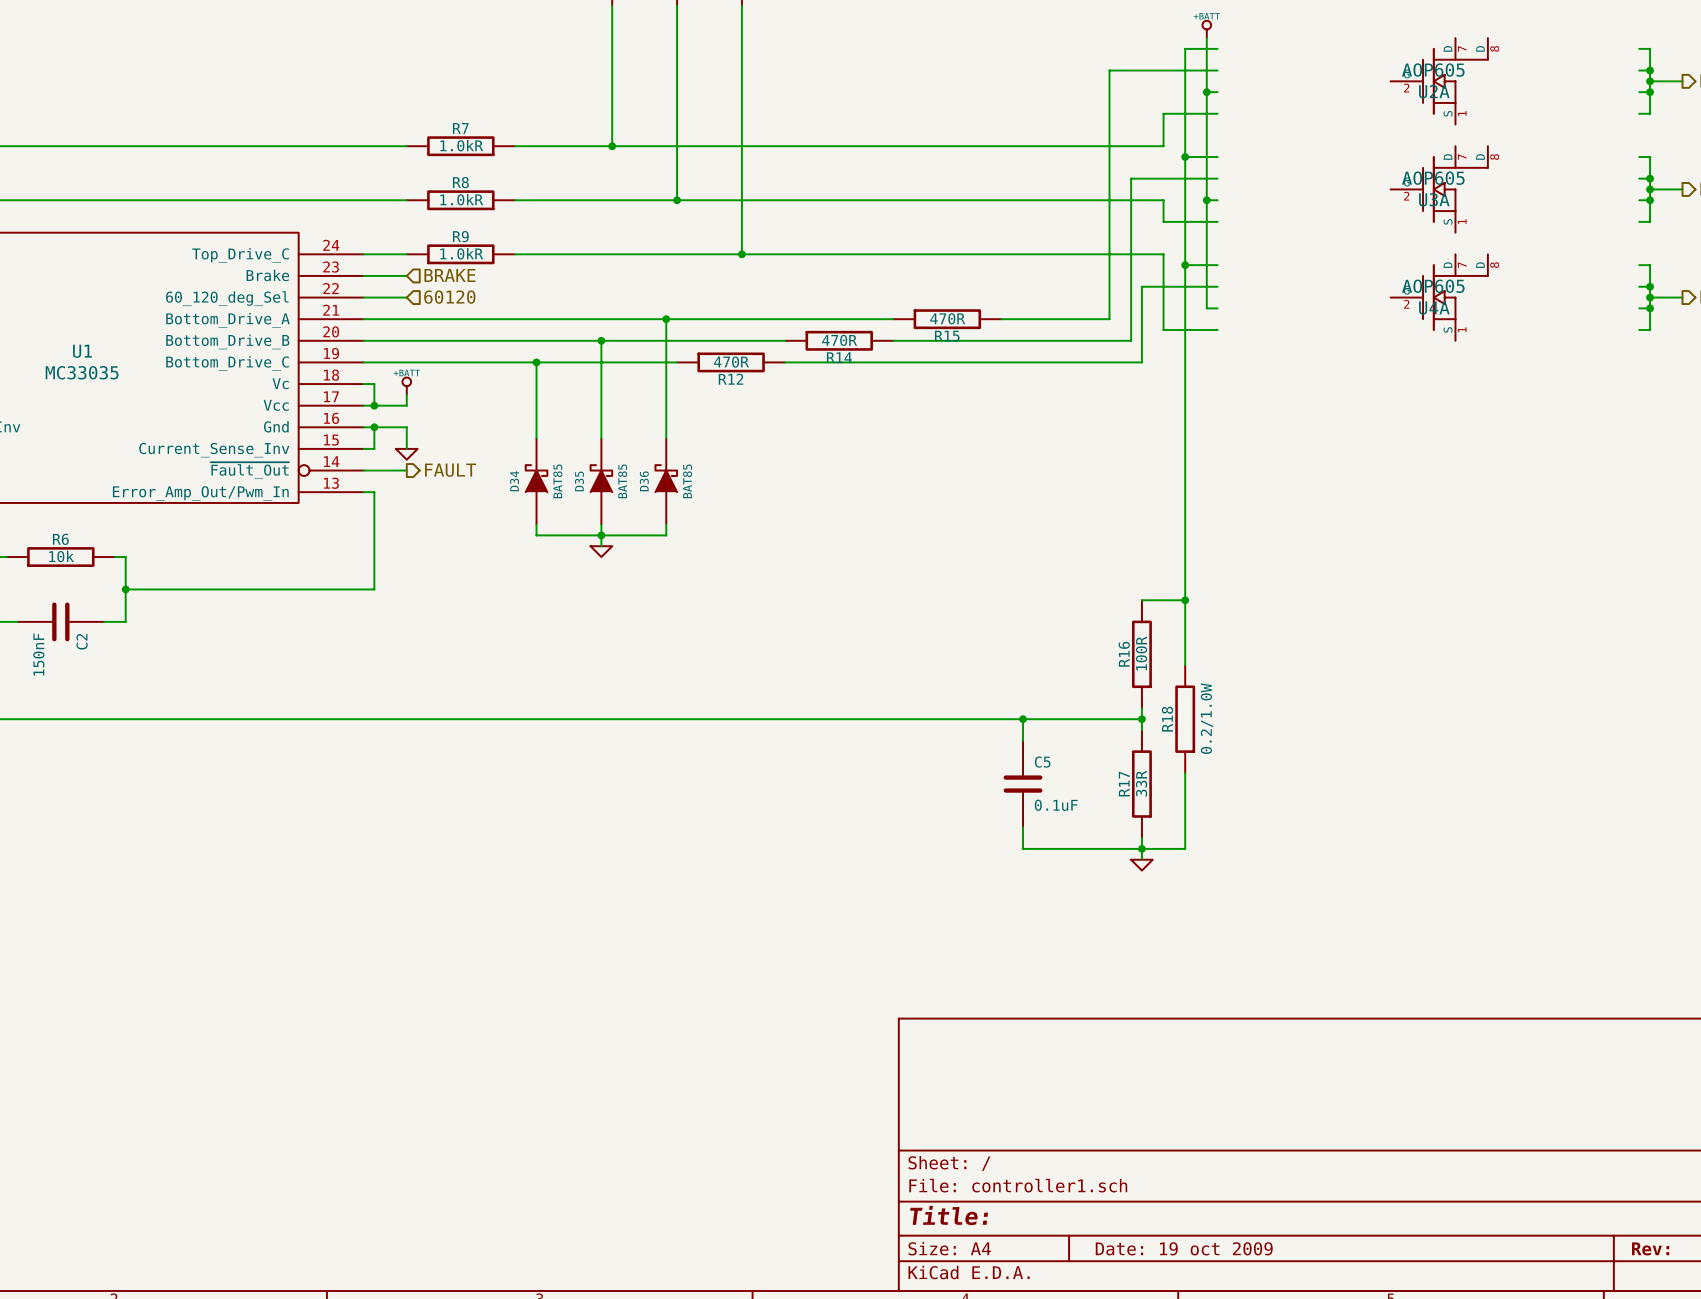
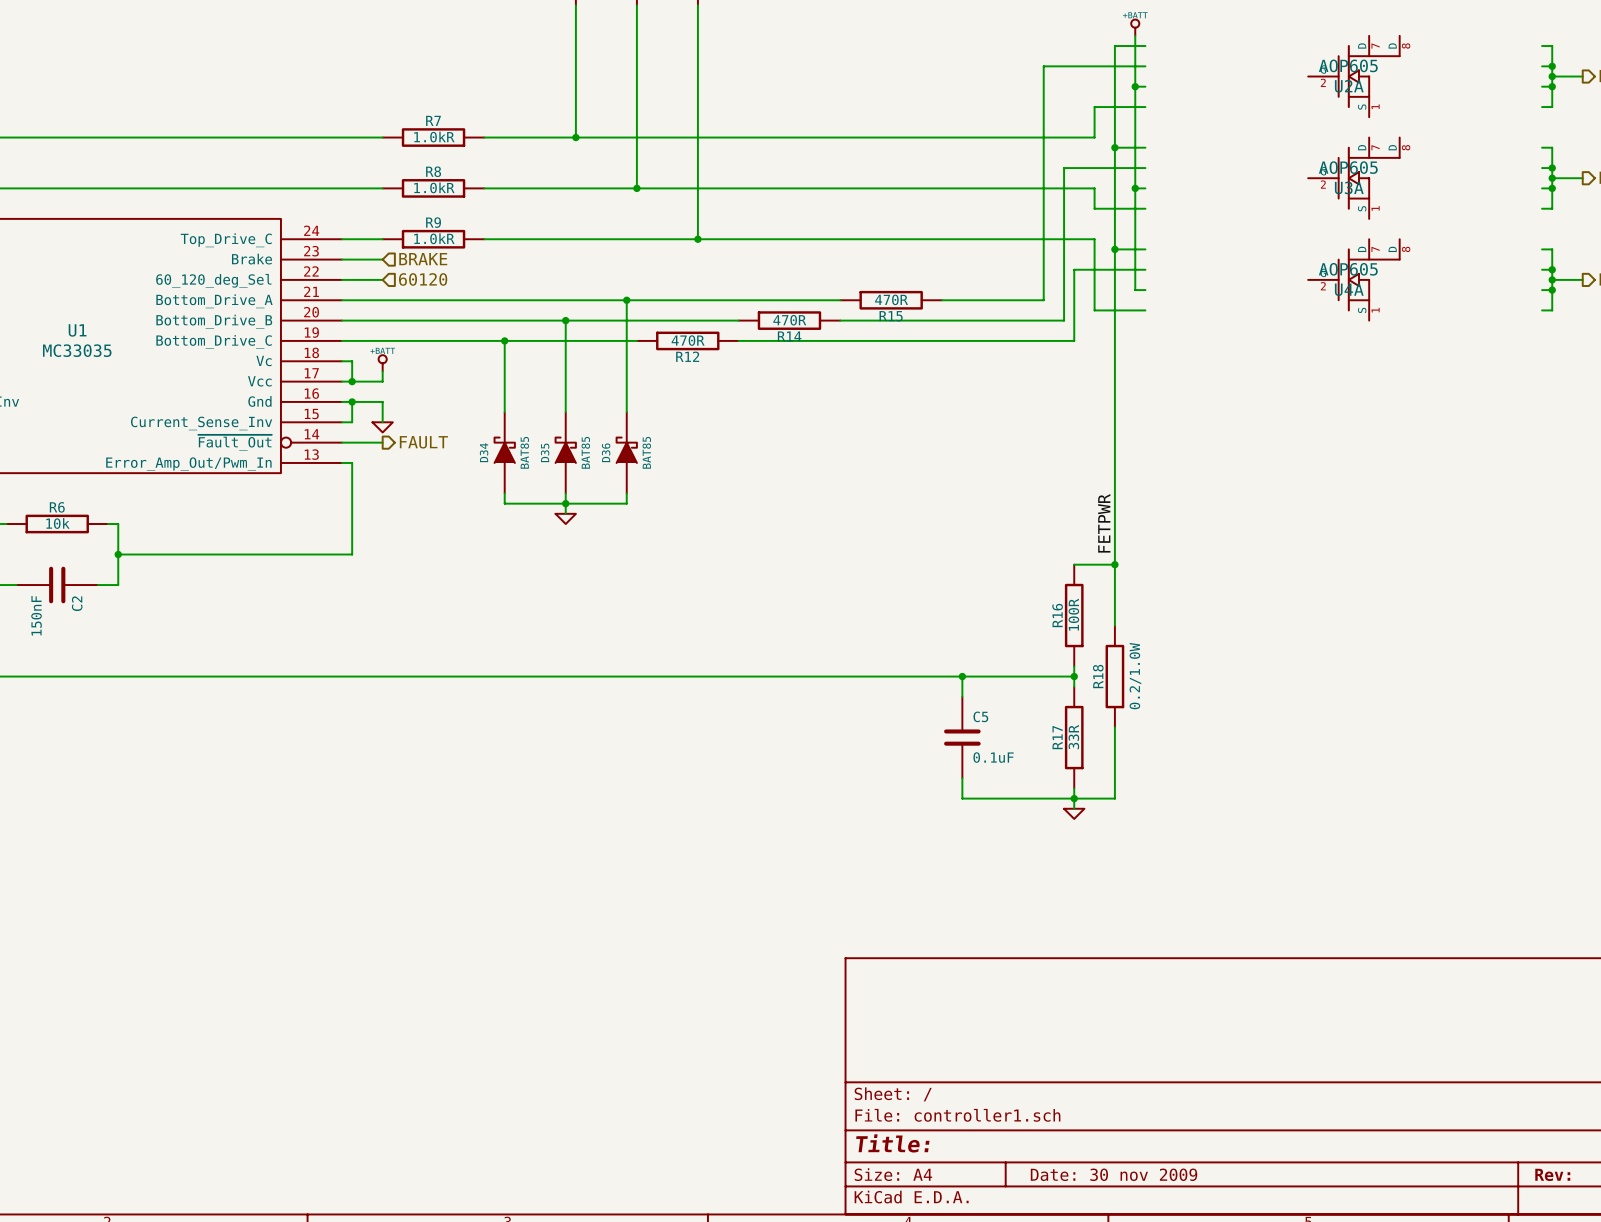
label: none -> FETPWR (1104, 523)
title block: Date: 19 oct 2009 (1184, 1248) -> Date: 30 nov 2009 (1114, 1174)

